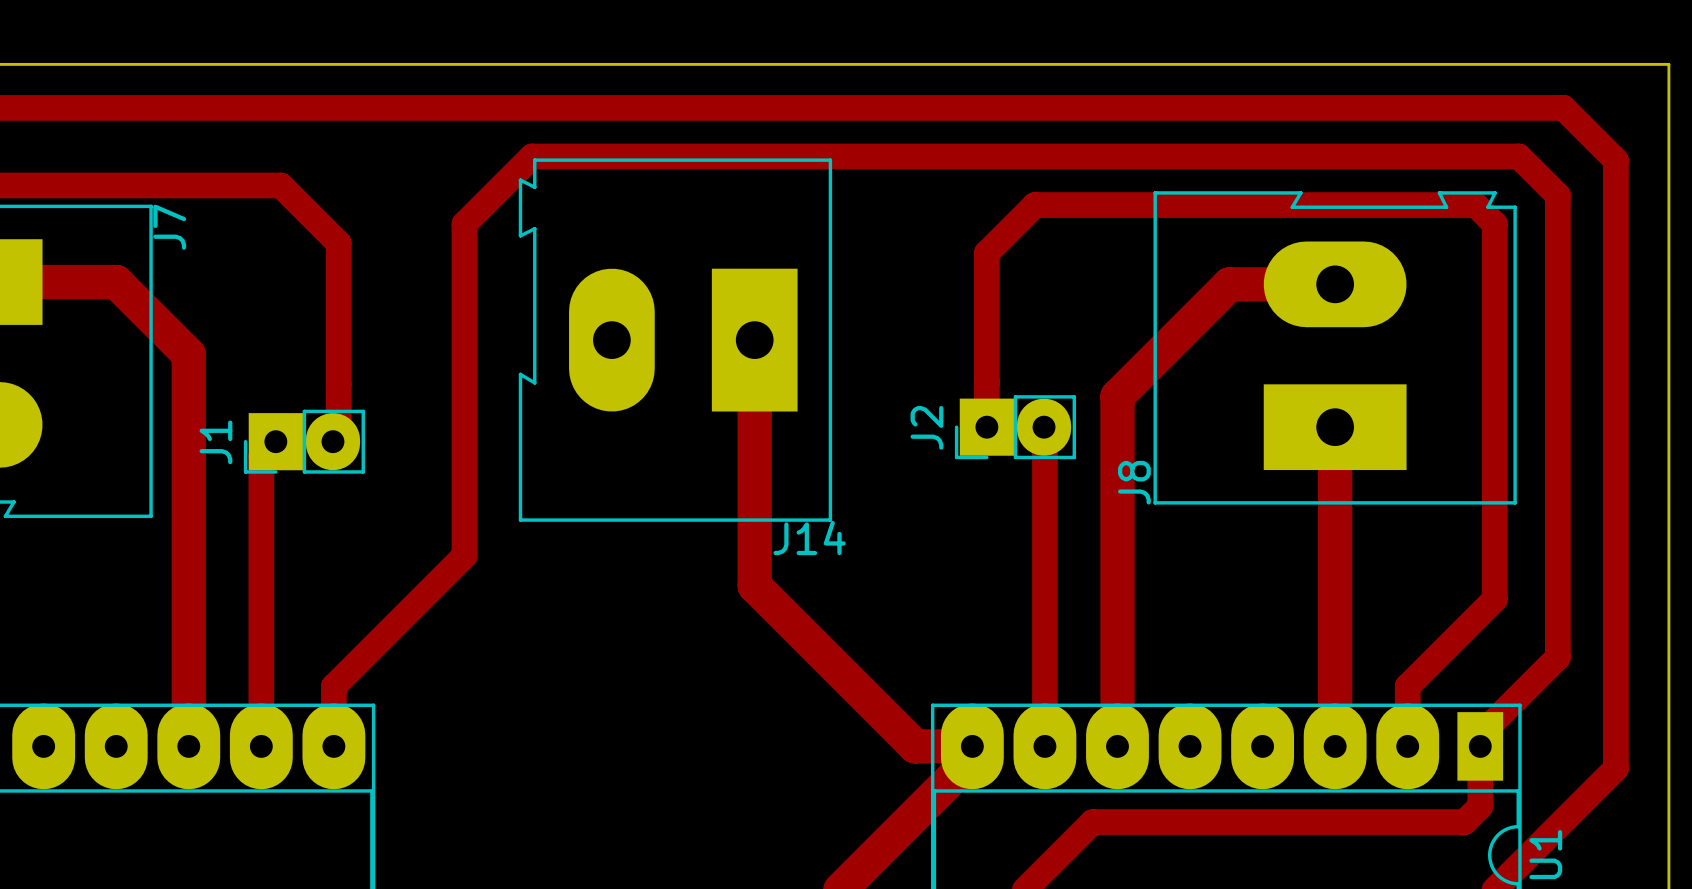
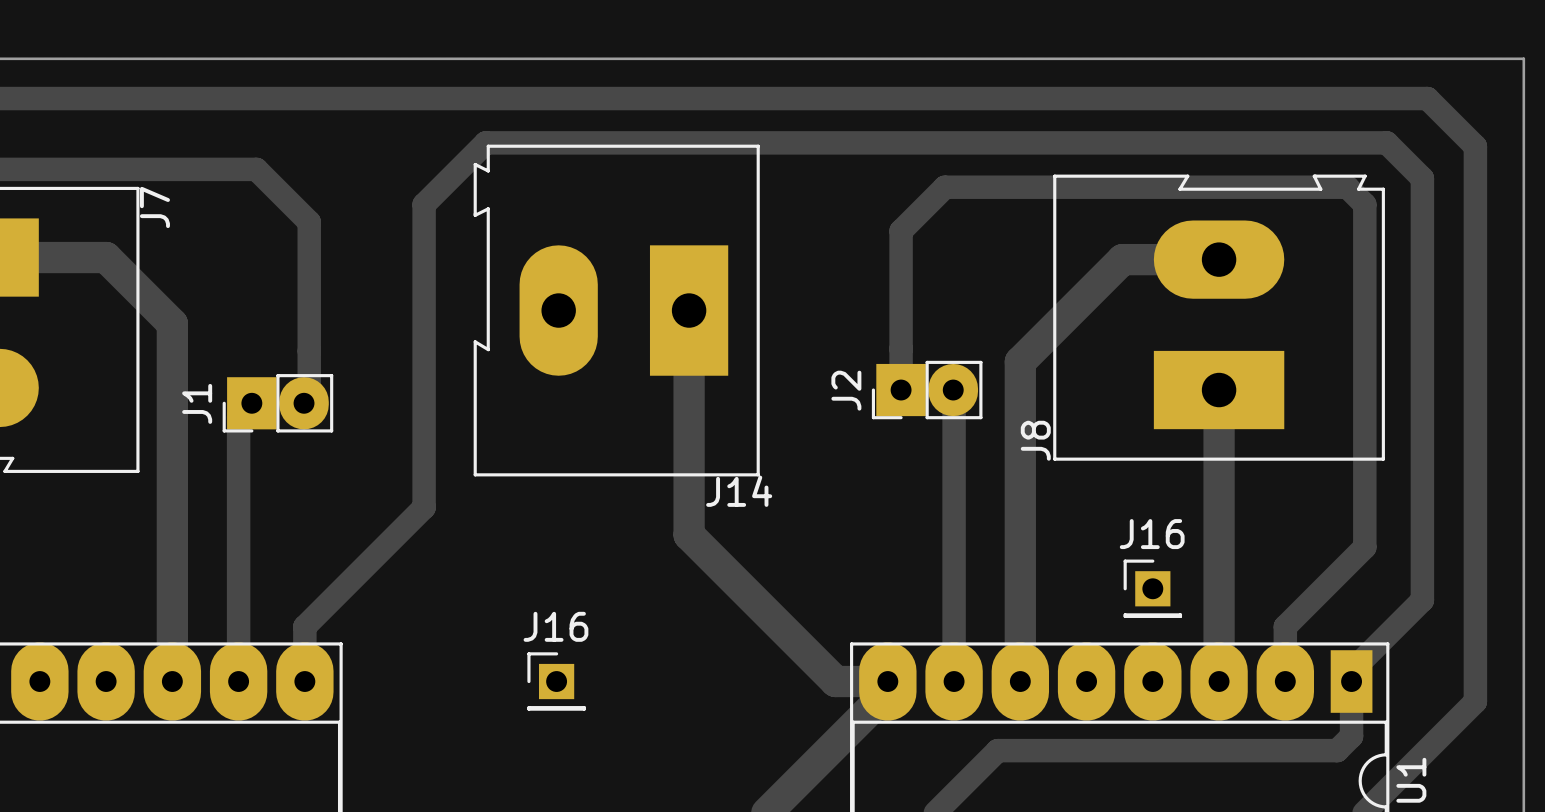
J16: none -> (1152, 588)
J16: none -> (556, 681)

